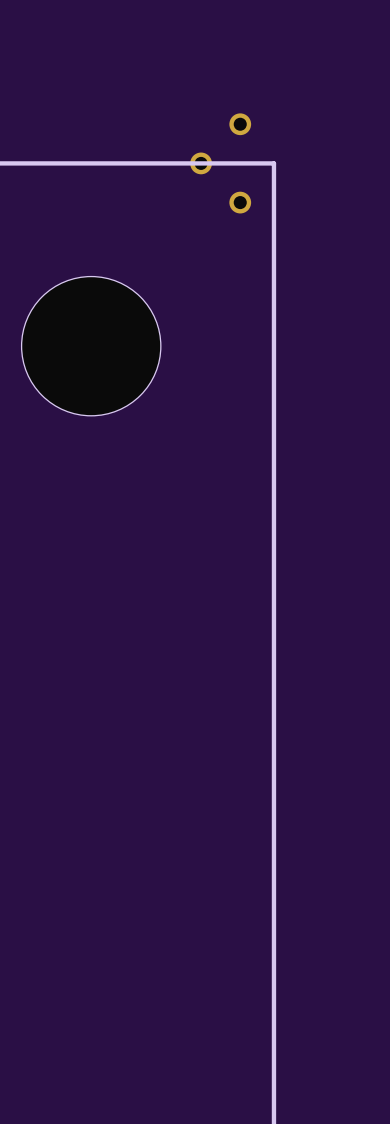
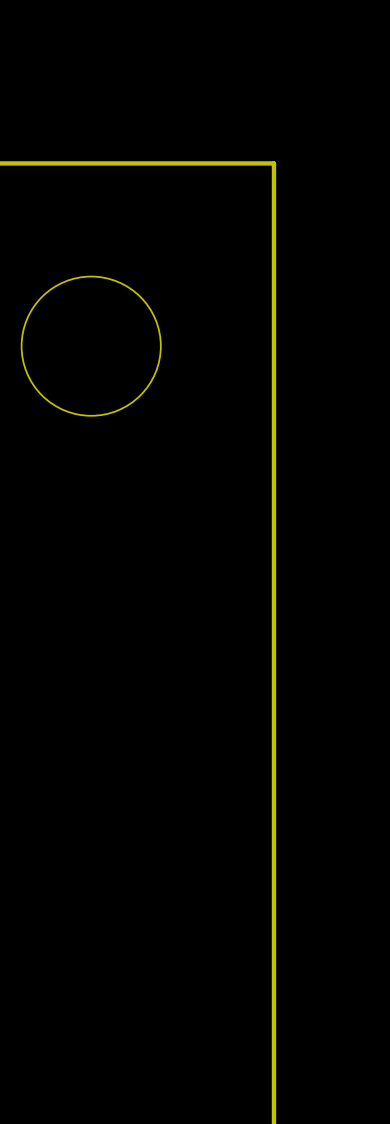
via: (240, 124) -> none
via: (201, 163) -> none
via: (240, 202) -> none

